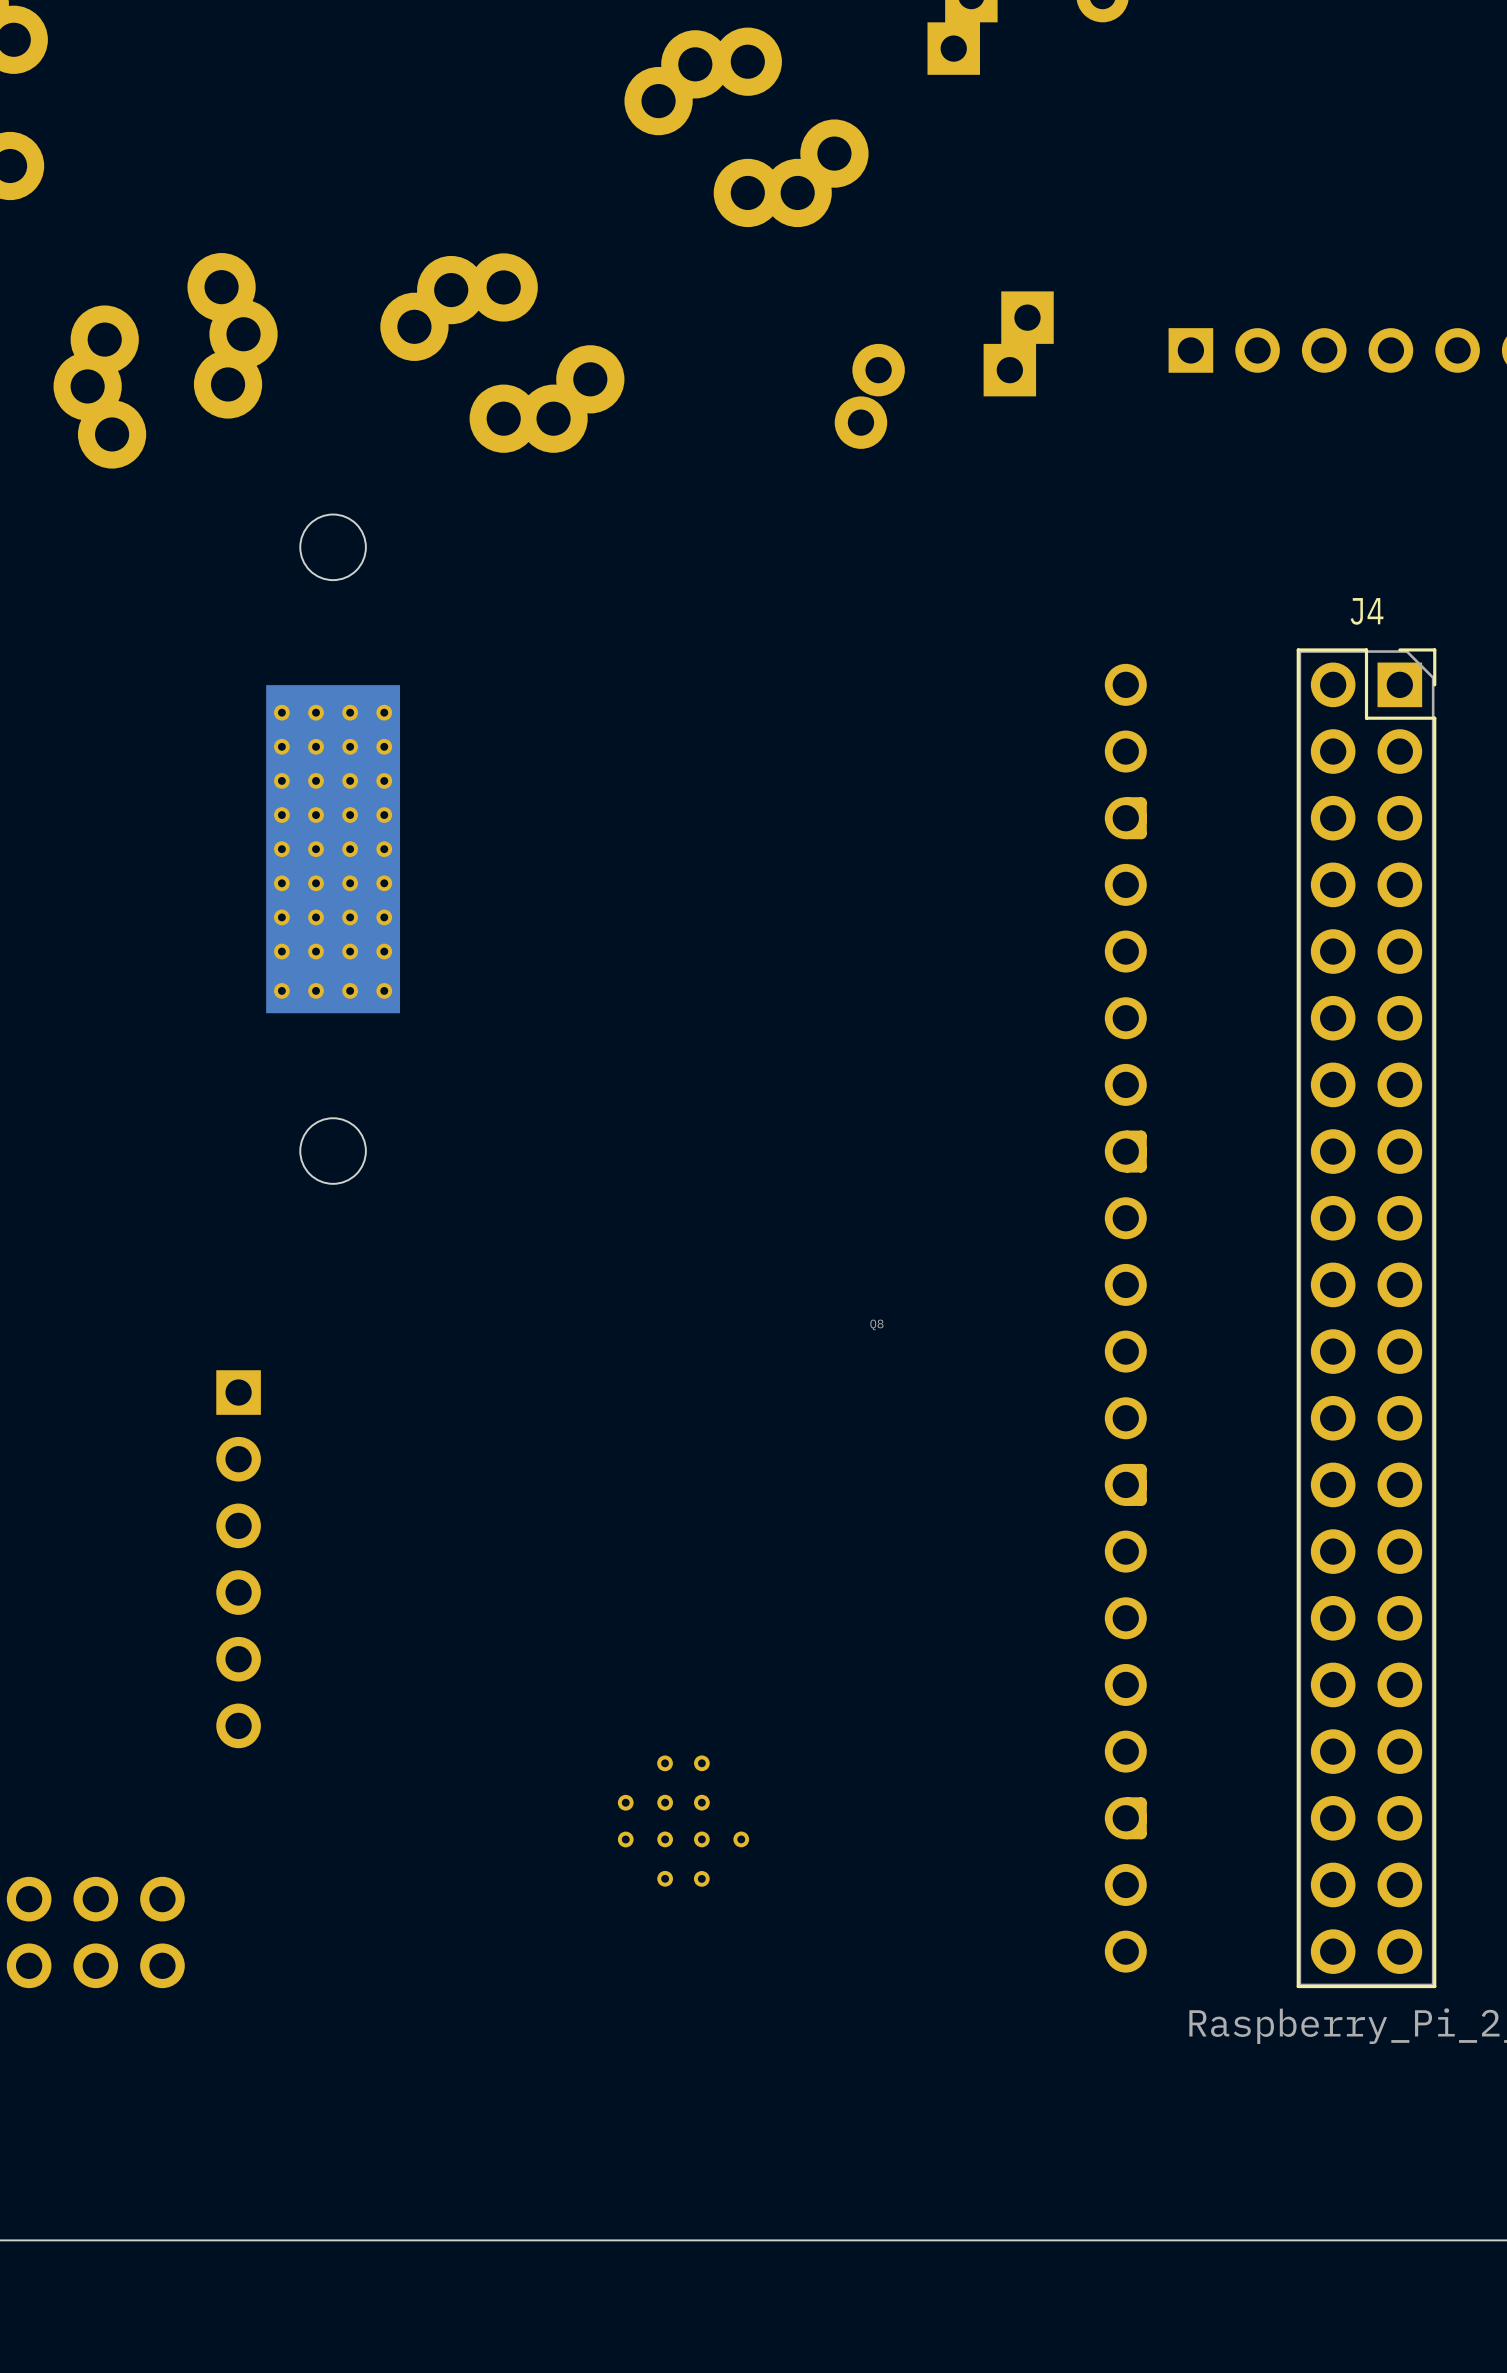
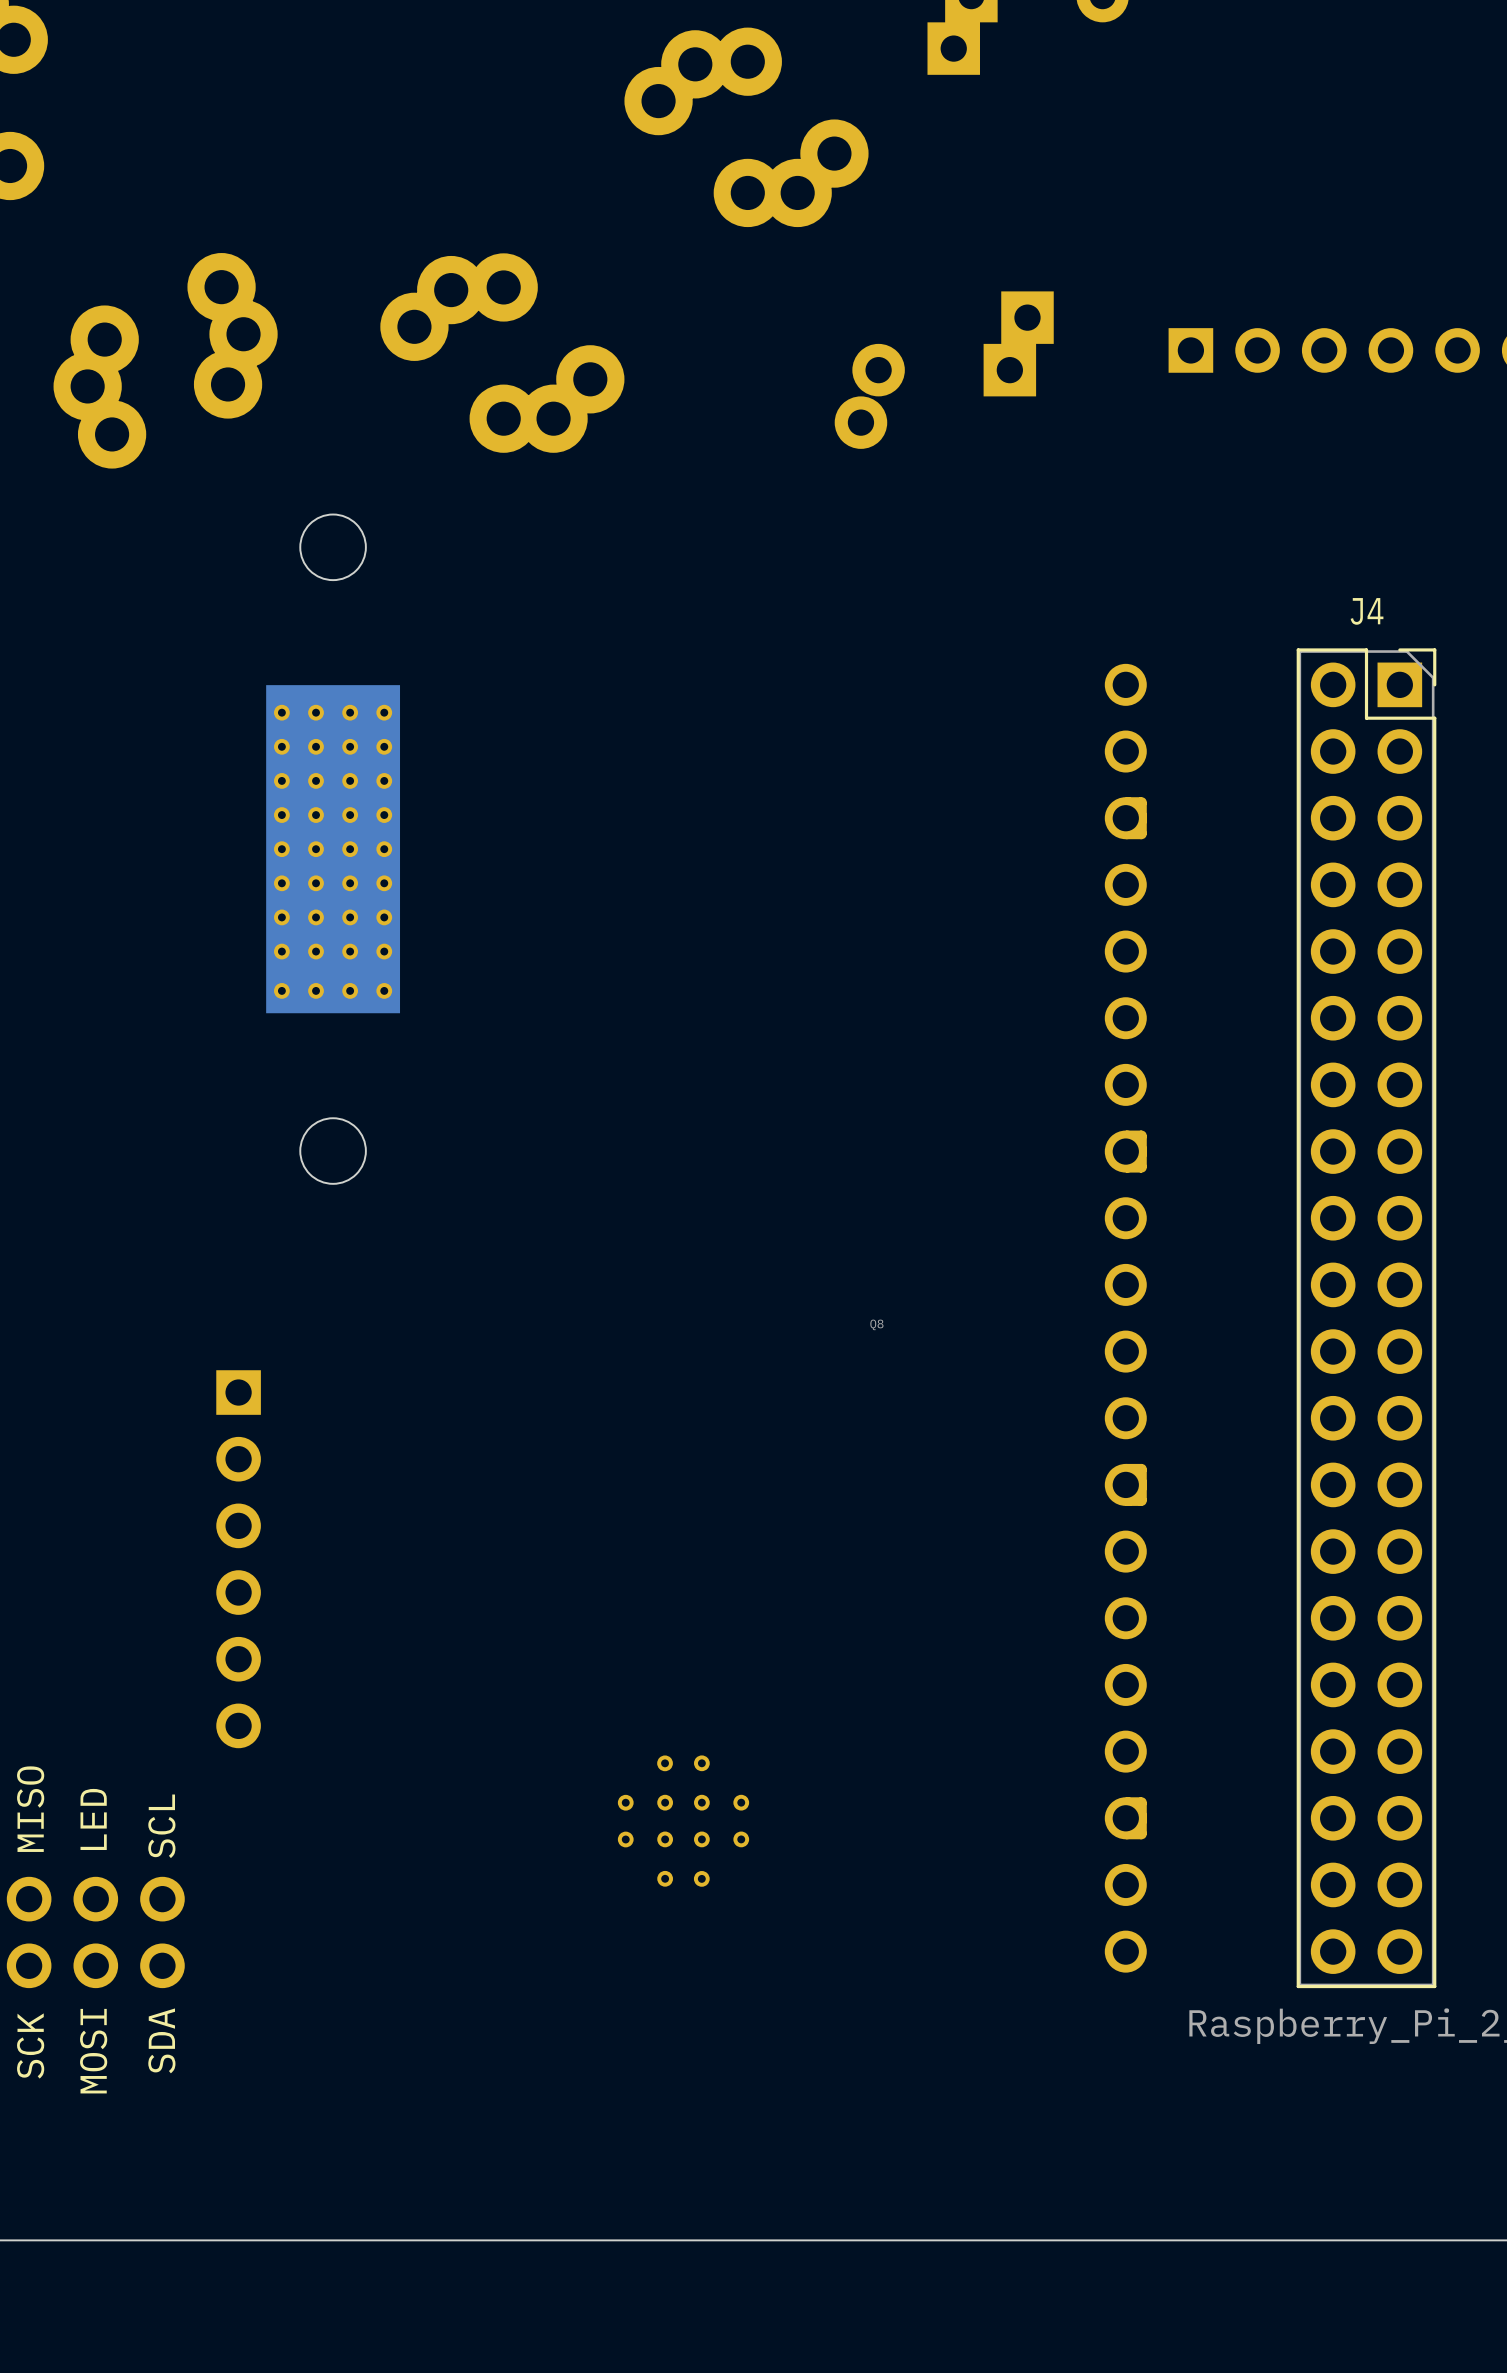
part footprint: [617, 1755, 750, 1887] -> [617, 1755, 750, 1887]
text: none -> MISO (30, 1809)
text: none -> LED (93, 1819)
text: none -> SCL (161, 1826)
text: none -> SDA (161, 2040)
text: none -> SCK (30, 2045)
text: none -> MOSI (93, 2051)

